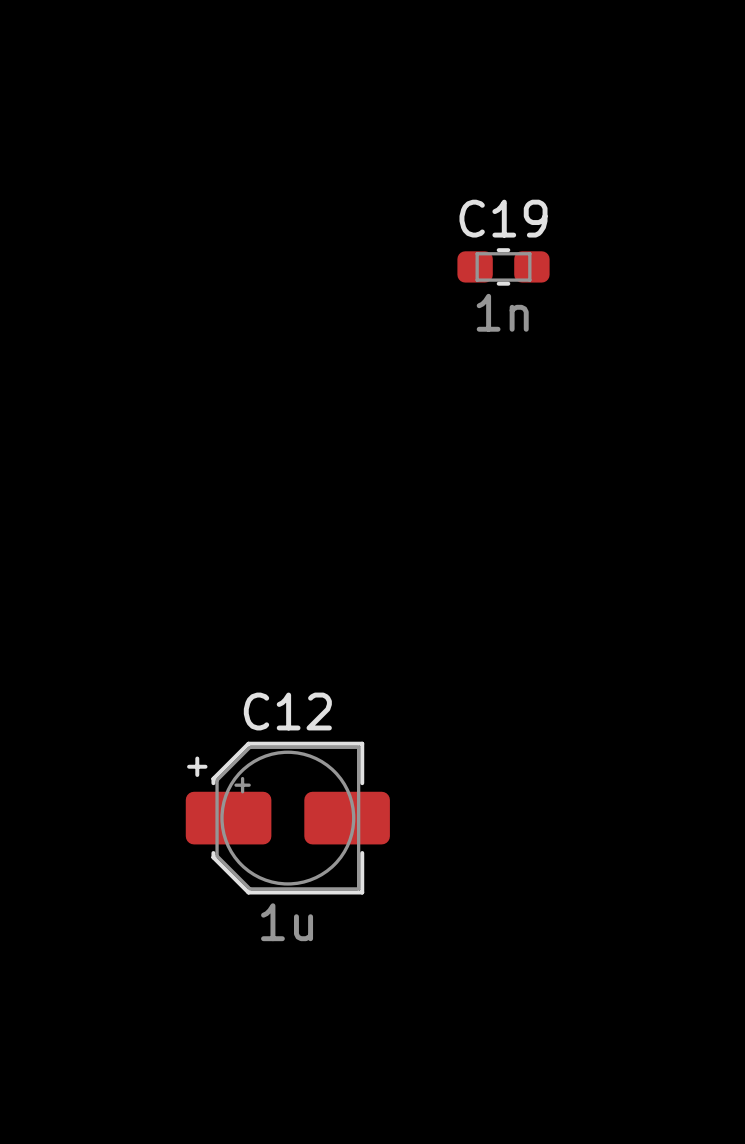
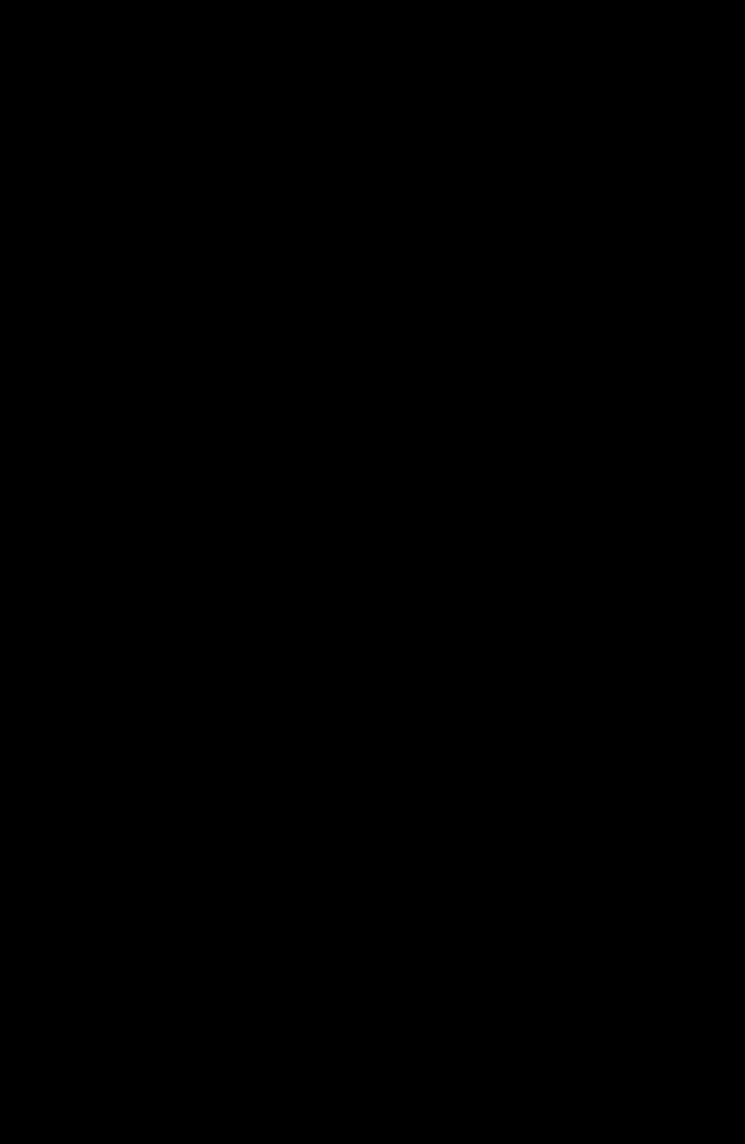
C19: 1n (503, 266) -> none
C12: 1u (287, 818) -> none

